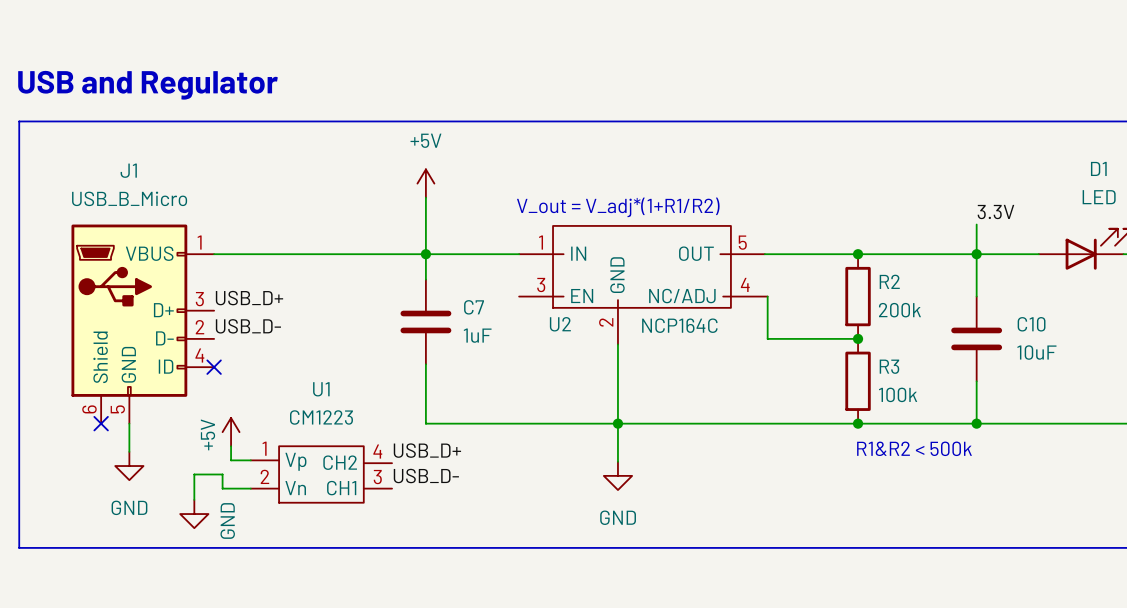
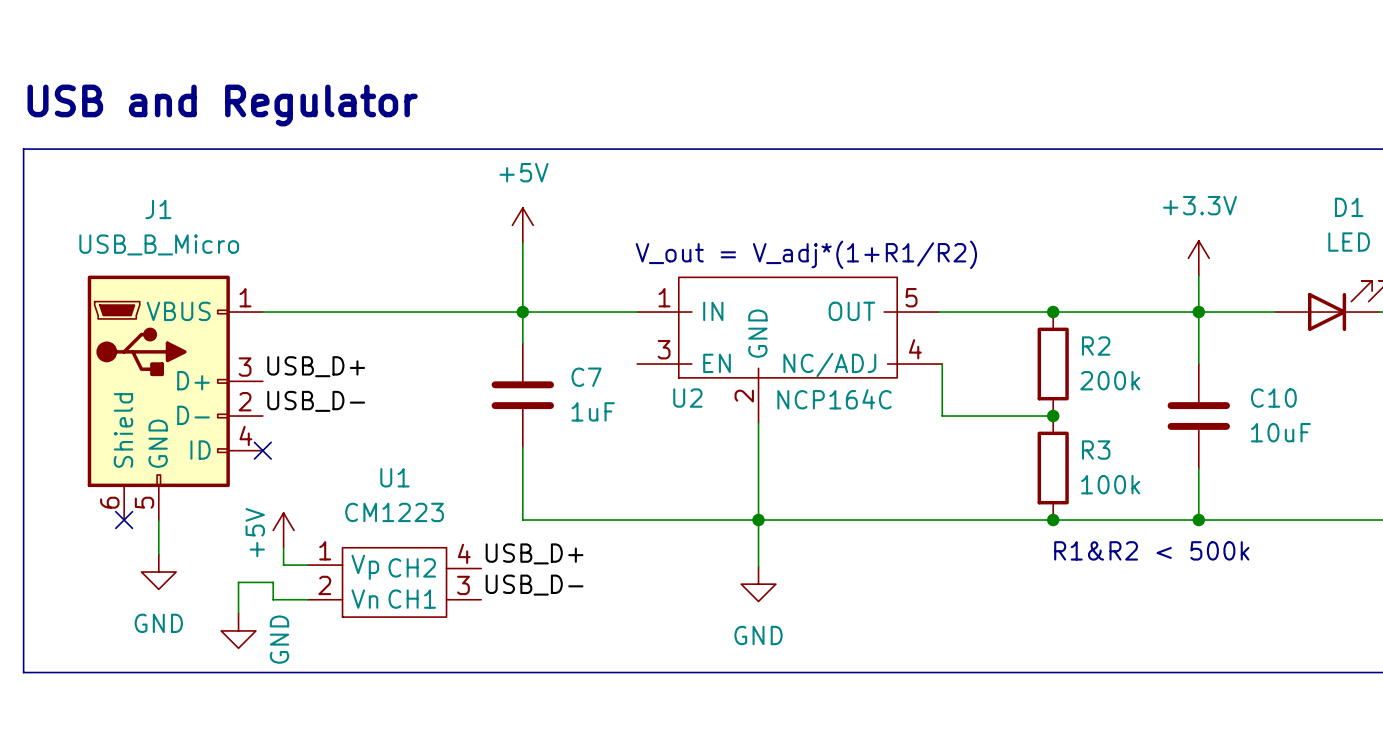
power symbol: none -> +3.3V (1198, 258)
label: 3.3V (995, 212) -> none

